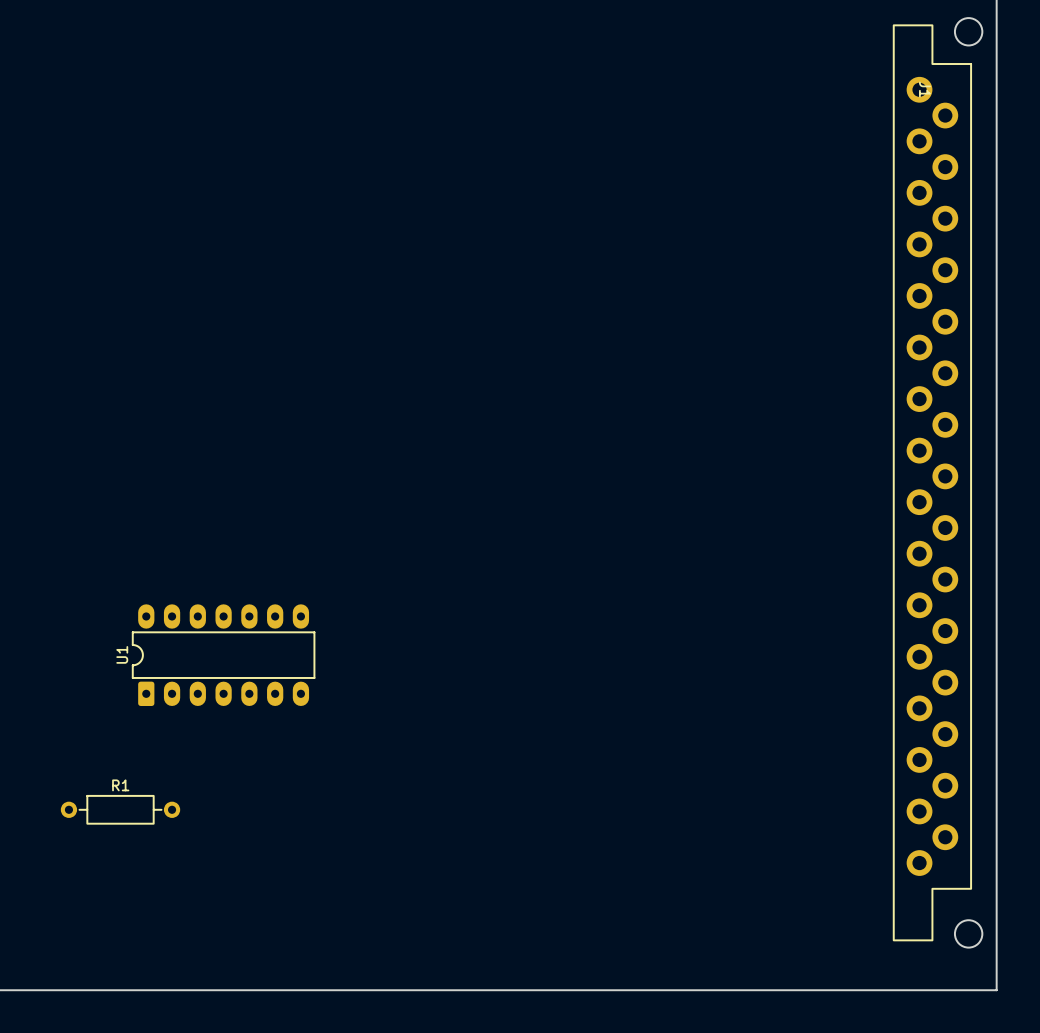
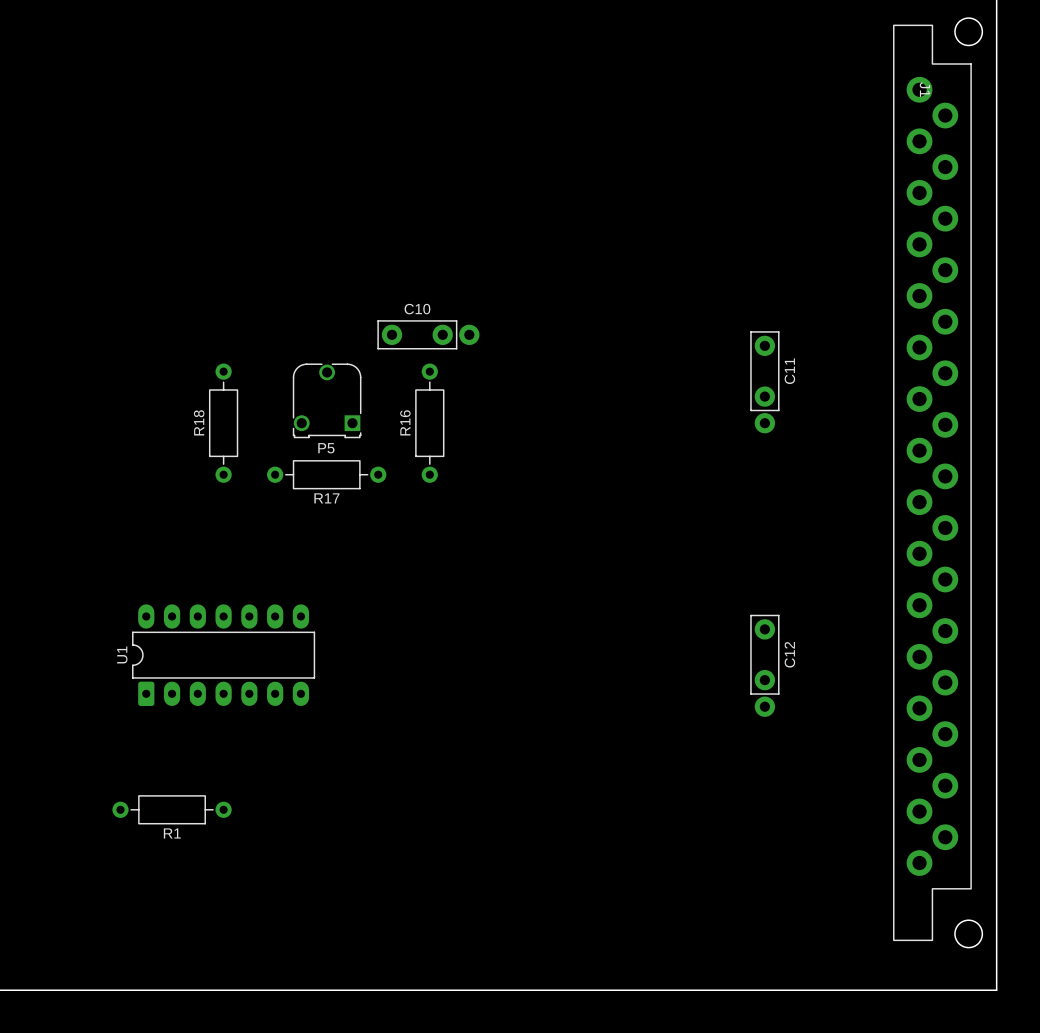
C10: none -> (428, 334)
C11: none -> (764, 382)
P5: none -> (327, 400)
R18: none -> (223, 423)
R16: none -> (429, 423)
R17: none -> (326, 474)
C12: none -> (764, 665)
R1 name position: R1 (120, 785) -> R1 (172, 833)
R1 position: (120, 809) -> (172, 809)

